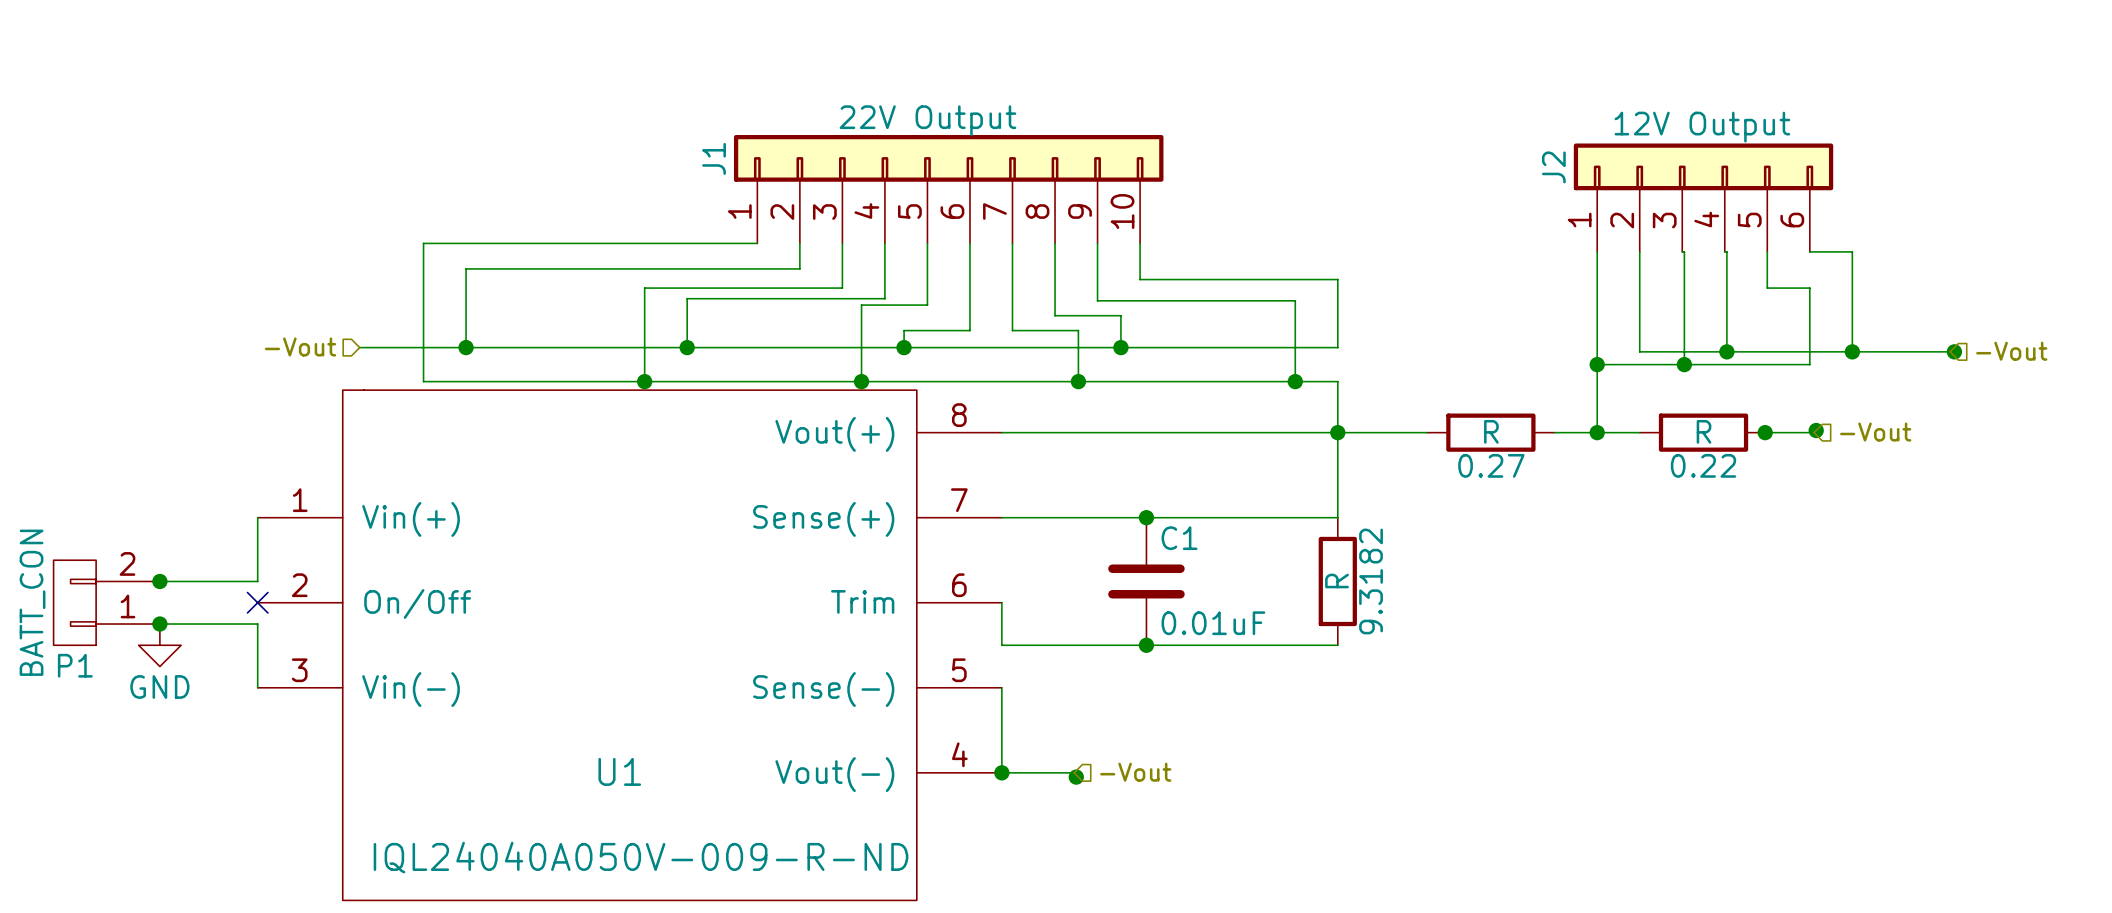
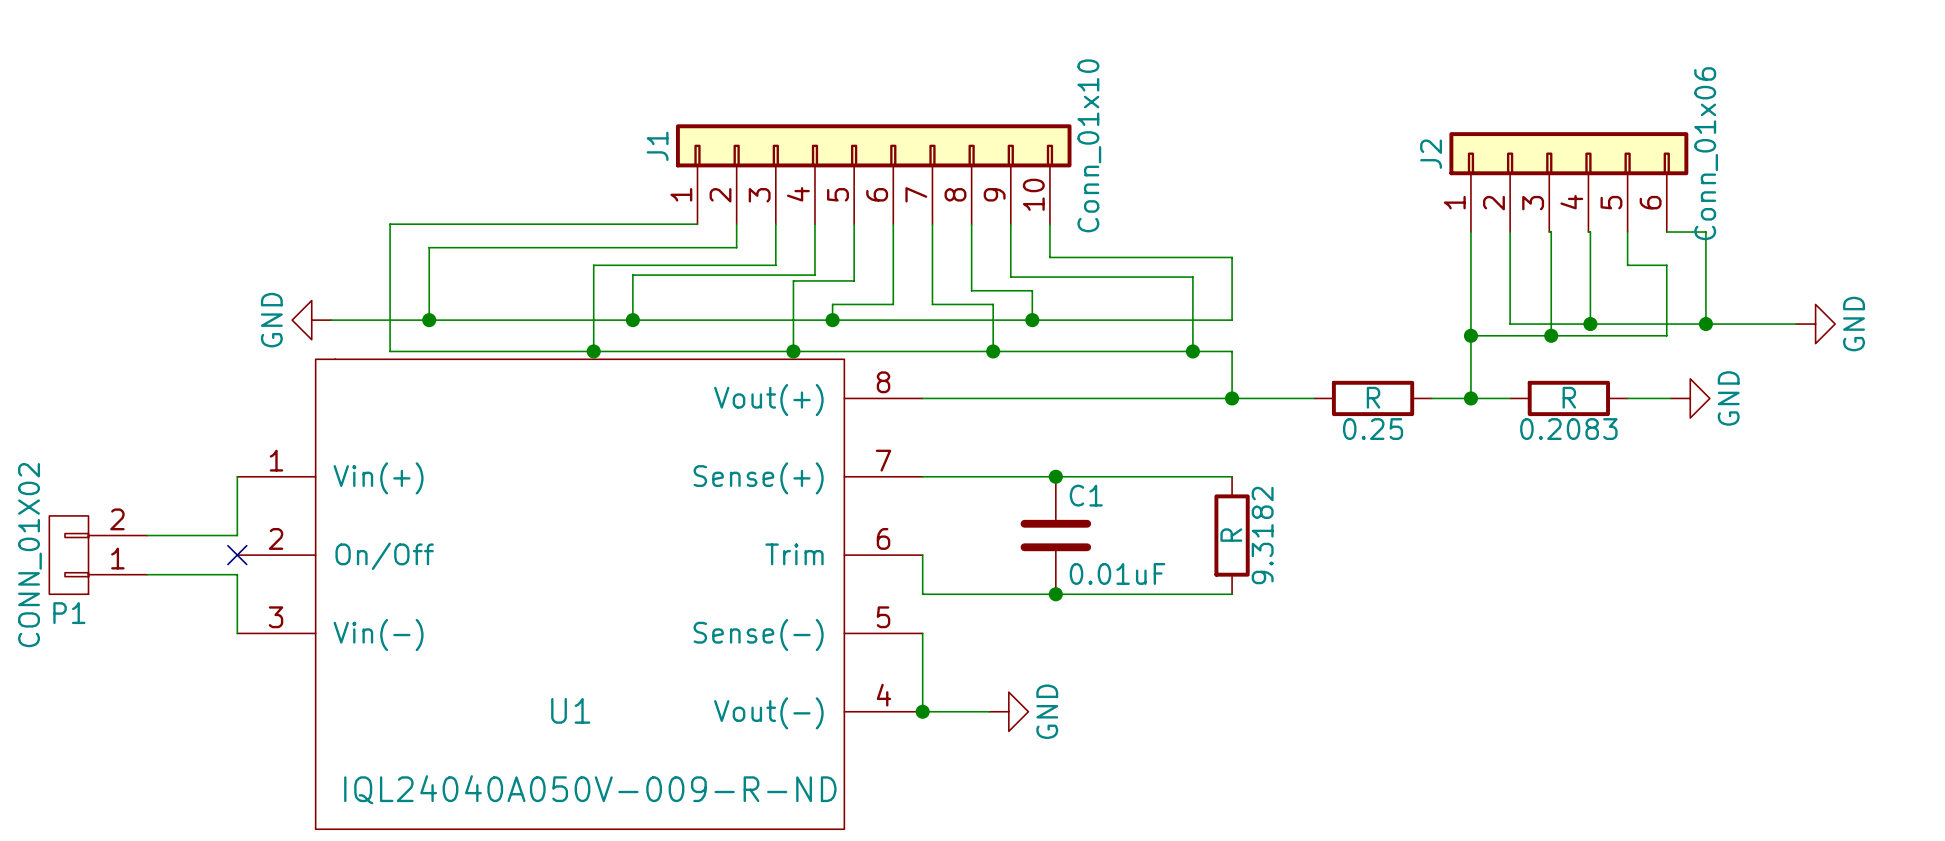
J1 value: 22V Output (927, 120) -> Conn_01x10 (1089, 145)
J2 value: 12V Output (1702, 127) -> Conn_01x06 (1706, 153)
hierarchical label: -Vout (300, 346) -> none
junction: (1954, 351) -> none
power symbol: none -> GND (1815, 324)
hierarchical label: -Vout (2011, 351) -> none
junction: (1816, 430) -> none
wire: (1337, 432) (1337, 517) -> none
junction: (1765, 432) -> none
power symbol: none -> GND (1690, 398)
hierarchical label: -Vout (1875, 432) -> none
0.27 name: 0.27 (1491, 465) -> 0.25 (1373, 429)
0.22 name: 0.22 (1703, 465) -> 0.2083 (1568, 429)
junction: (159, 581) -> none
P1 value: BATT_CON (32, 602) -> CONN_01X02 (29, 555)
junction: (159, 624) -> none
power symbol rotation: 0° (159, 645) -> 90° clockwise (311, 320)
power symbol position: GND (159, 645) -> GND (311, 320)
power symbol: none -> GND (1008, 711)
hierarchical label: -Vout (1135, 772) -> none
junction: (1076, 777) -> none

